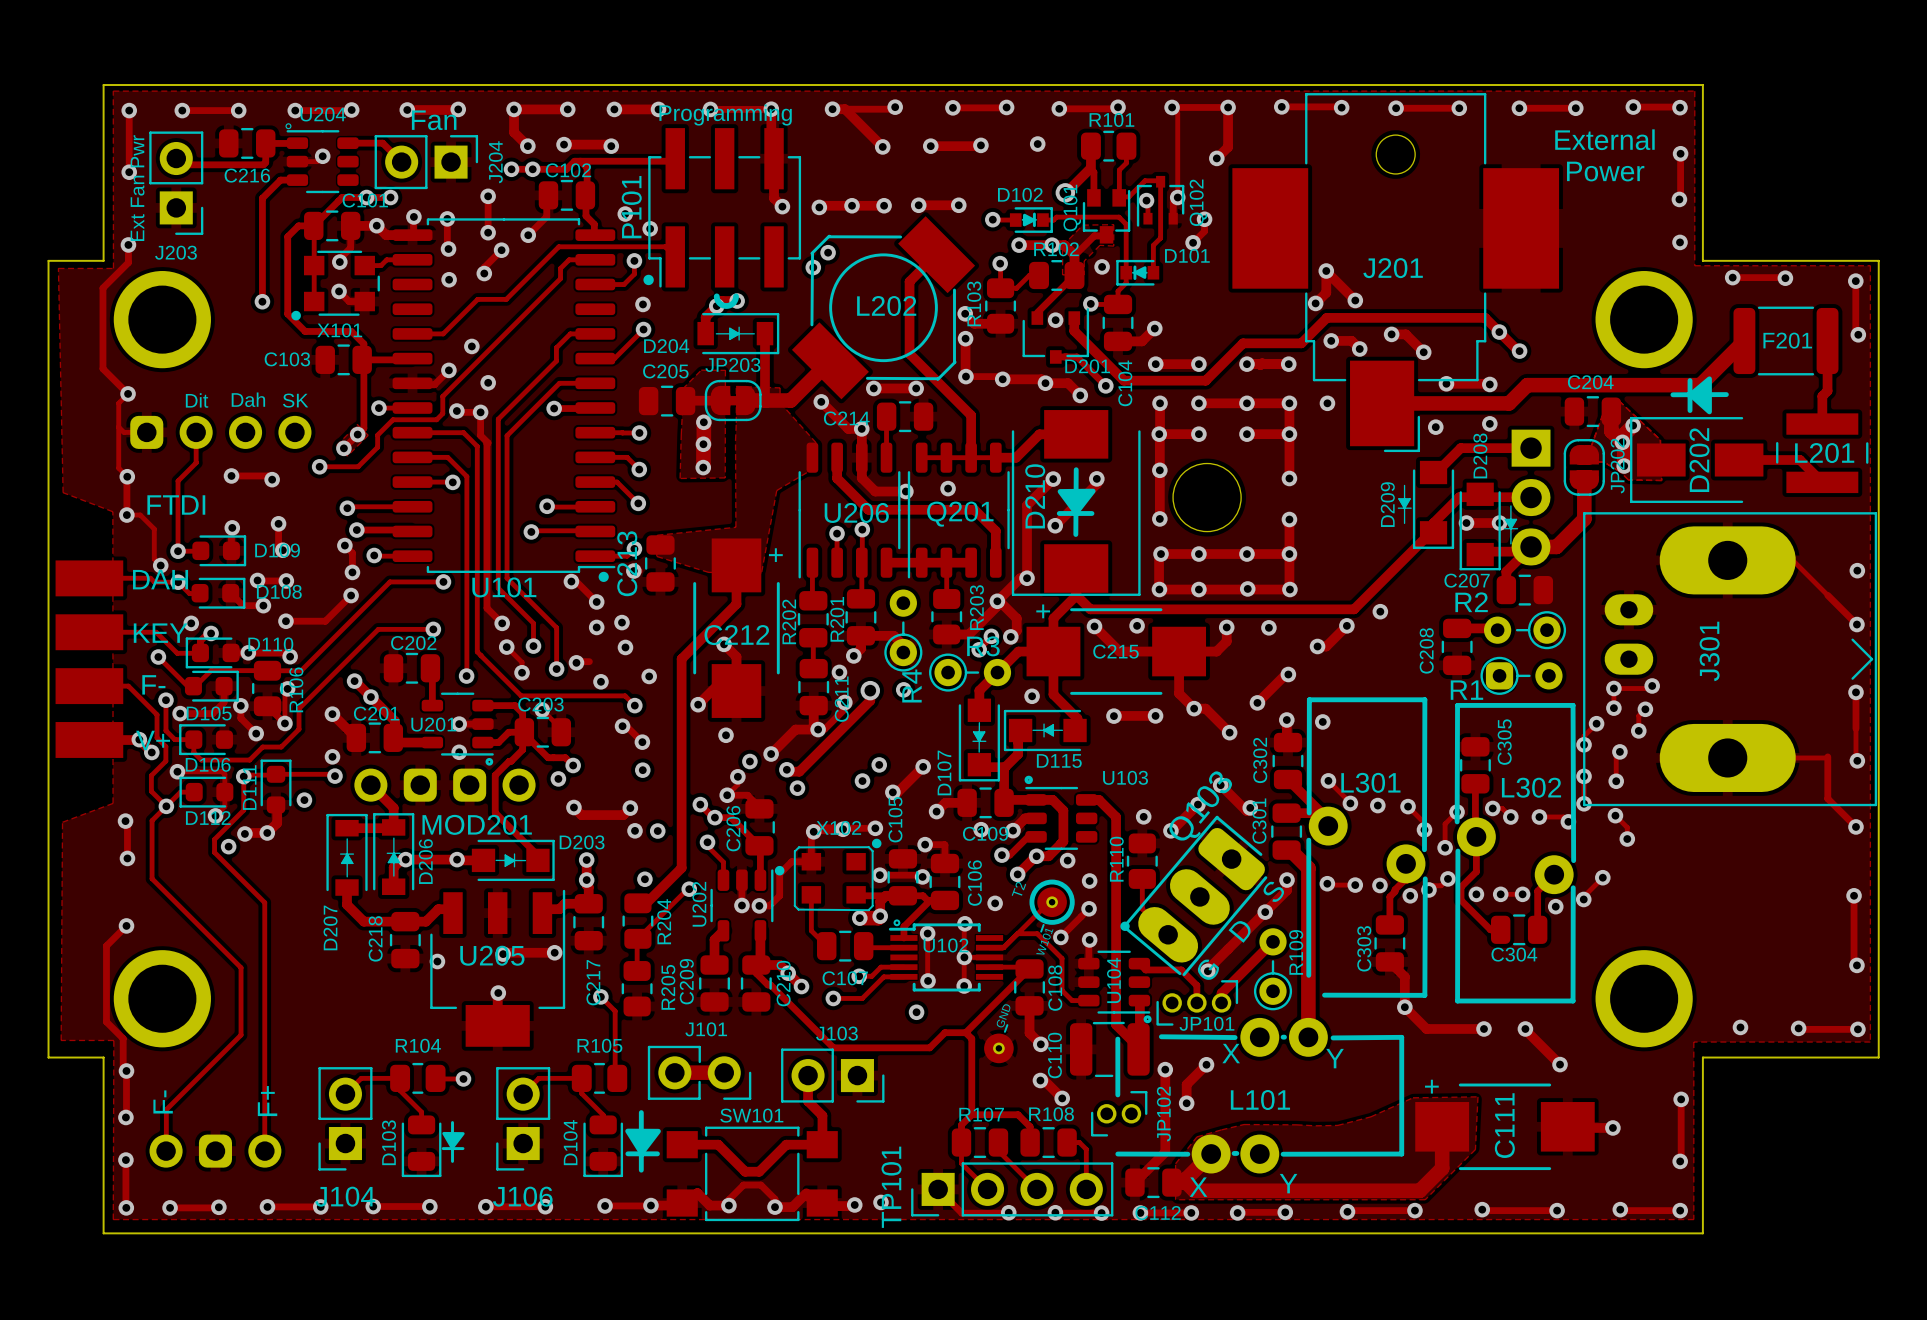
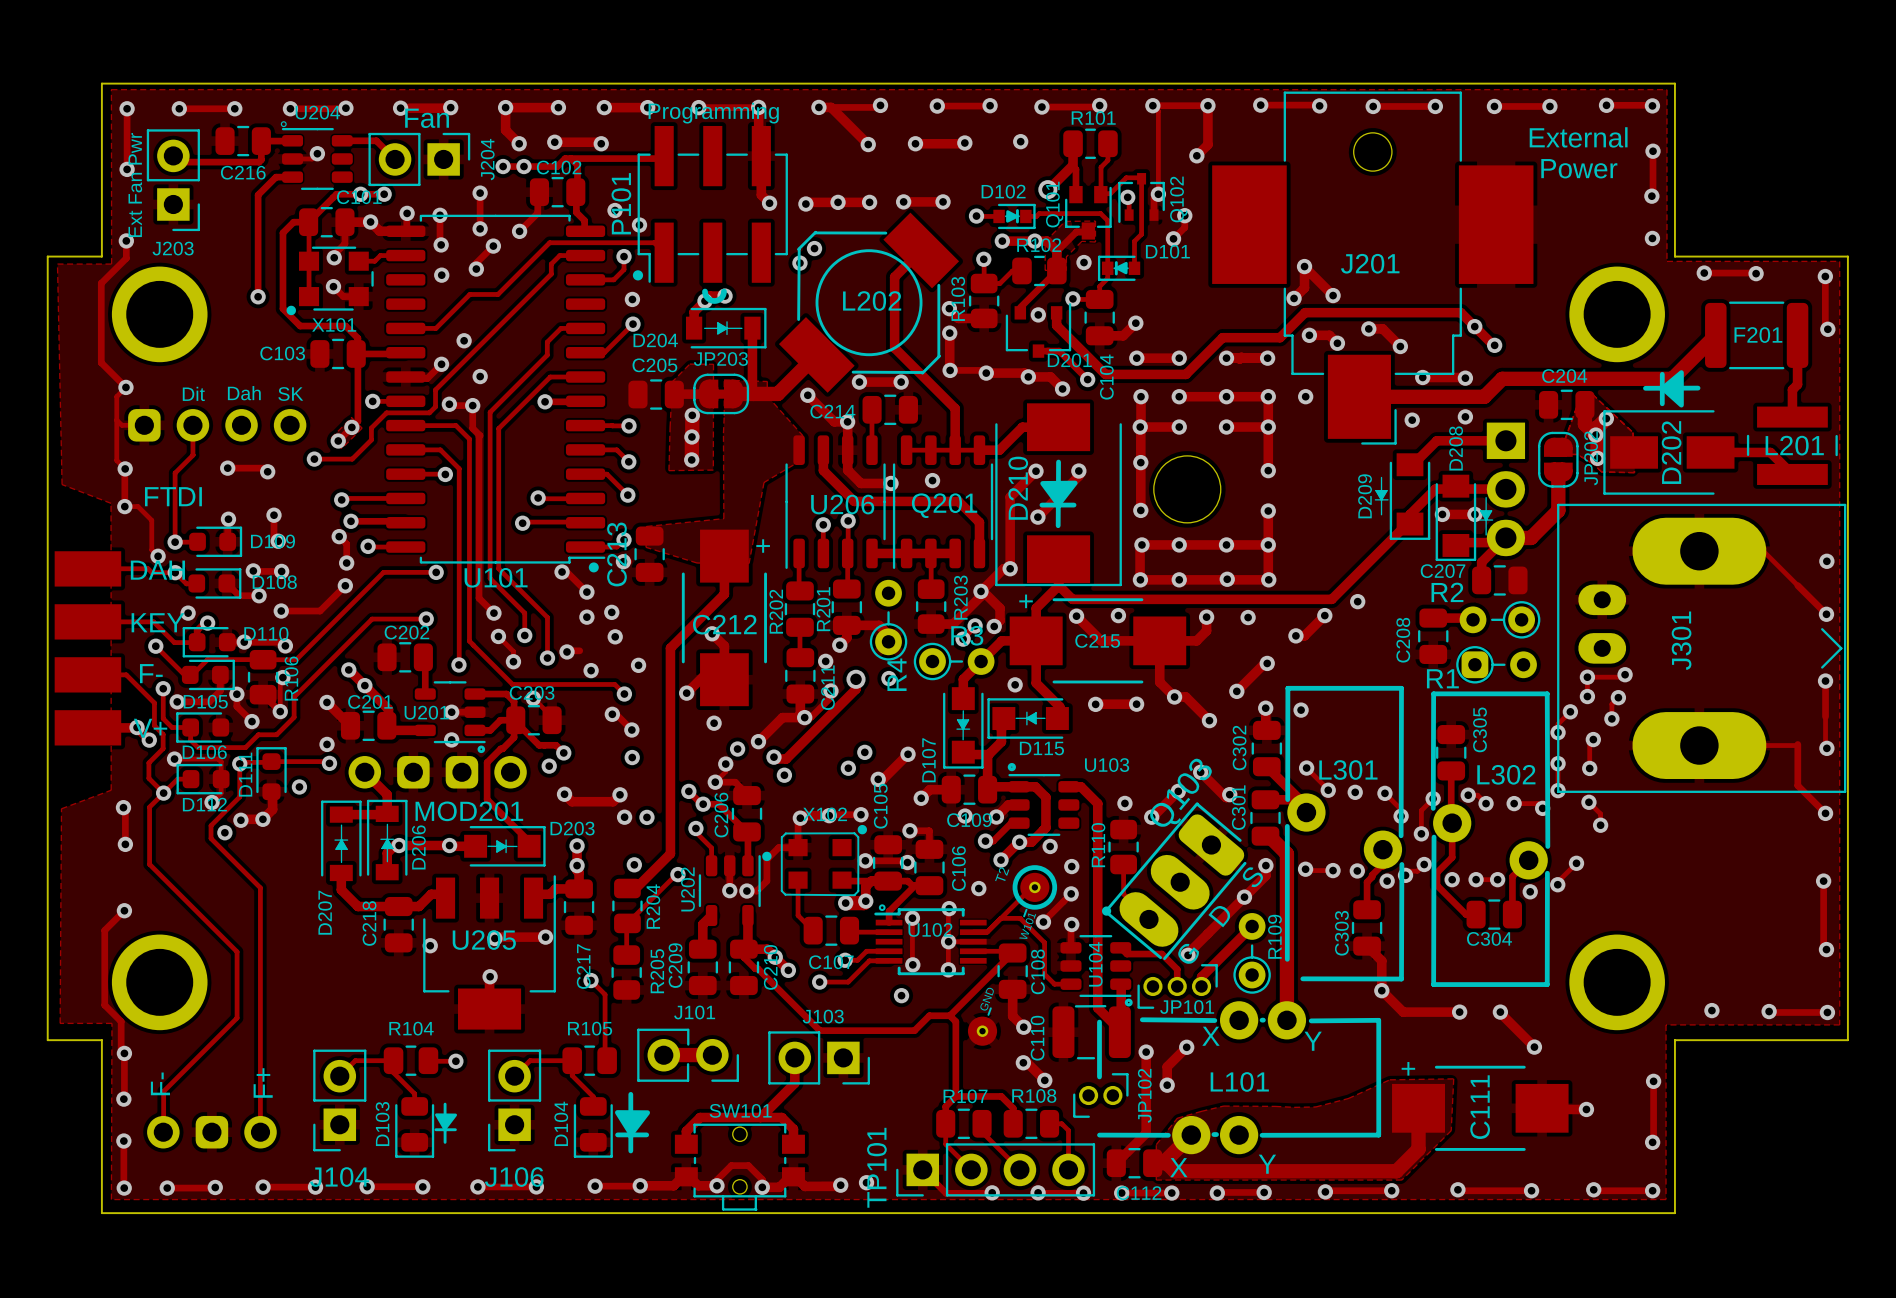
track: (808, 1101) (822, 1115) (822, 1143) -> (794, 1083) (760, 1117)
SW101 footprint: [666, 1126, 838, 1222] -> [674, 1123, 805, 1211]
track: (682, 1144) (718, 1144) (745, 1171) (759, 1171) (786, 1144) (822, 1144) -> none
track: none -> (686, 1144) (686, 1131) (700, 1117) (781, 1117) (793, 1129) (793, 1144)

